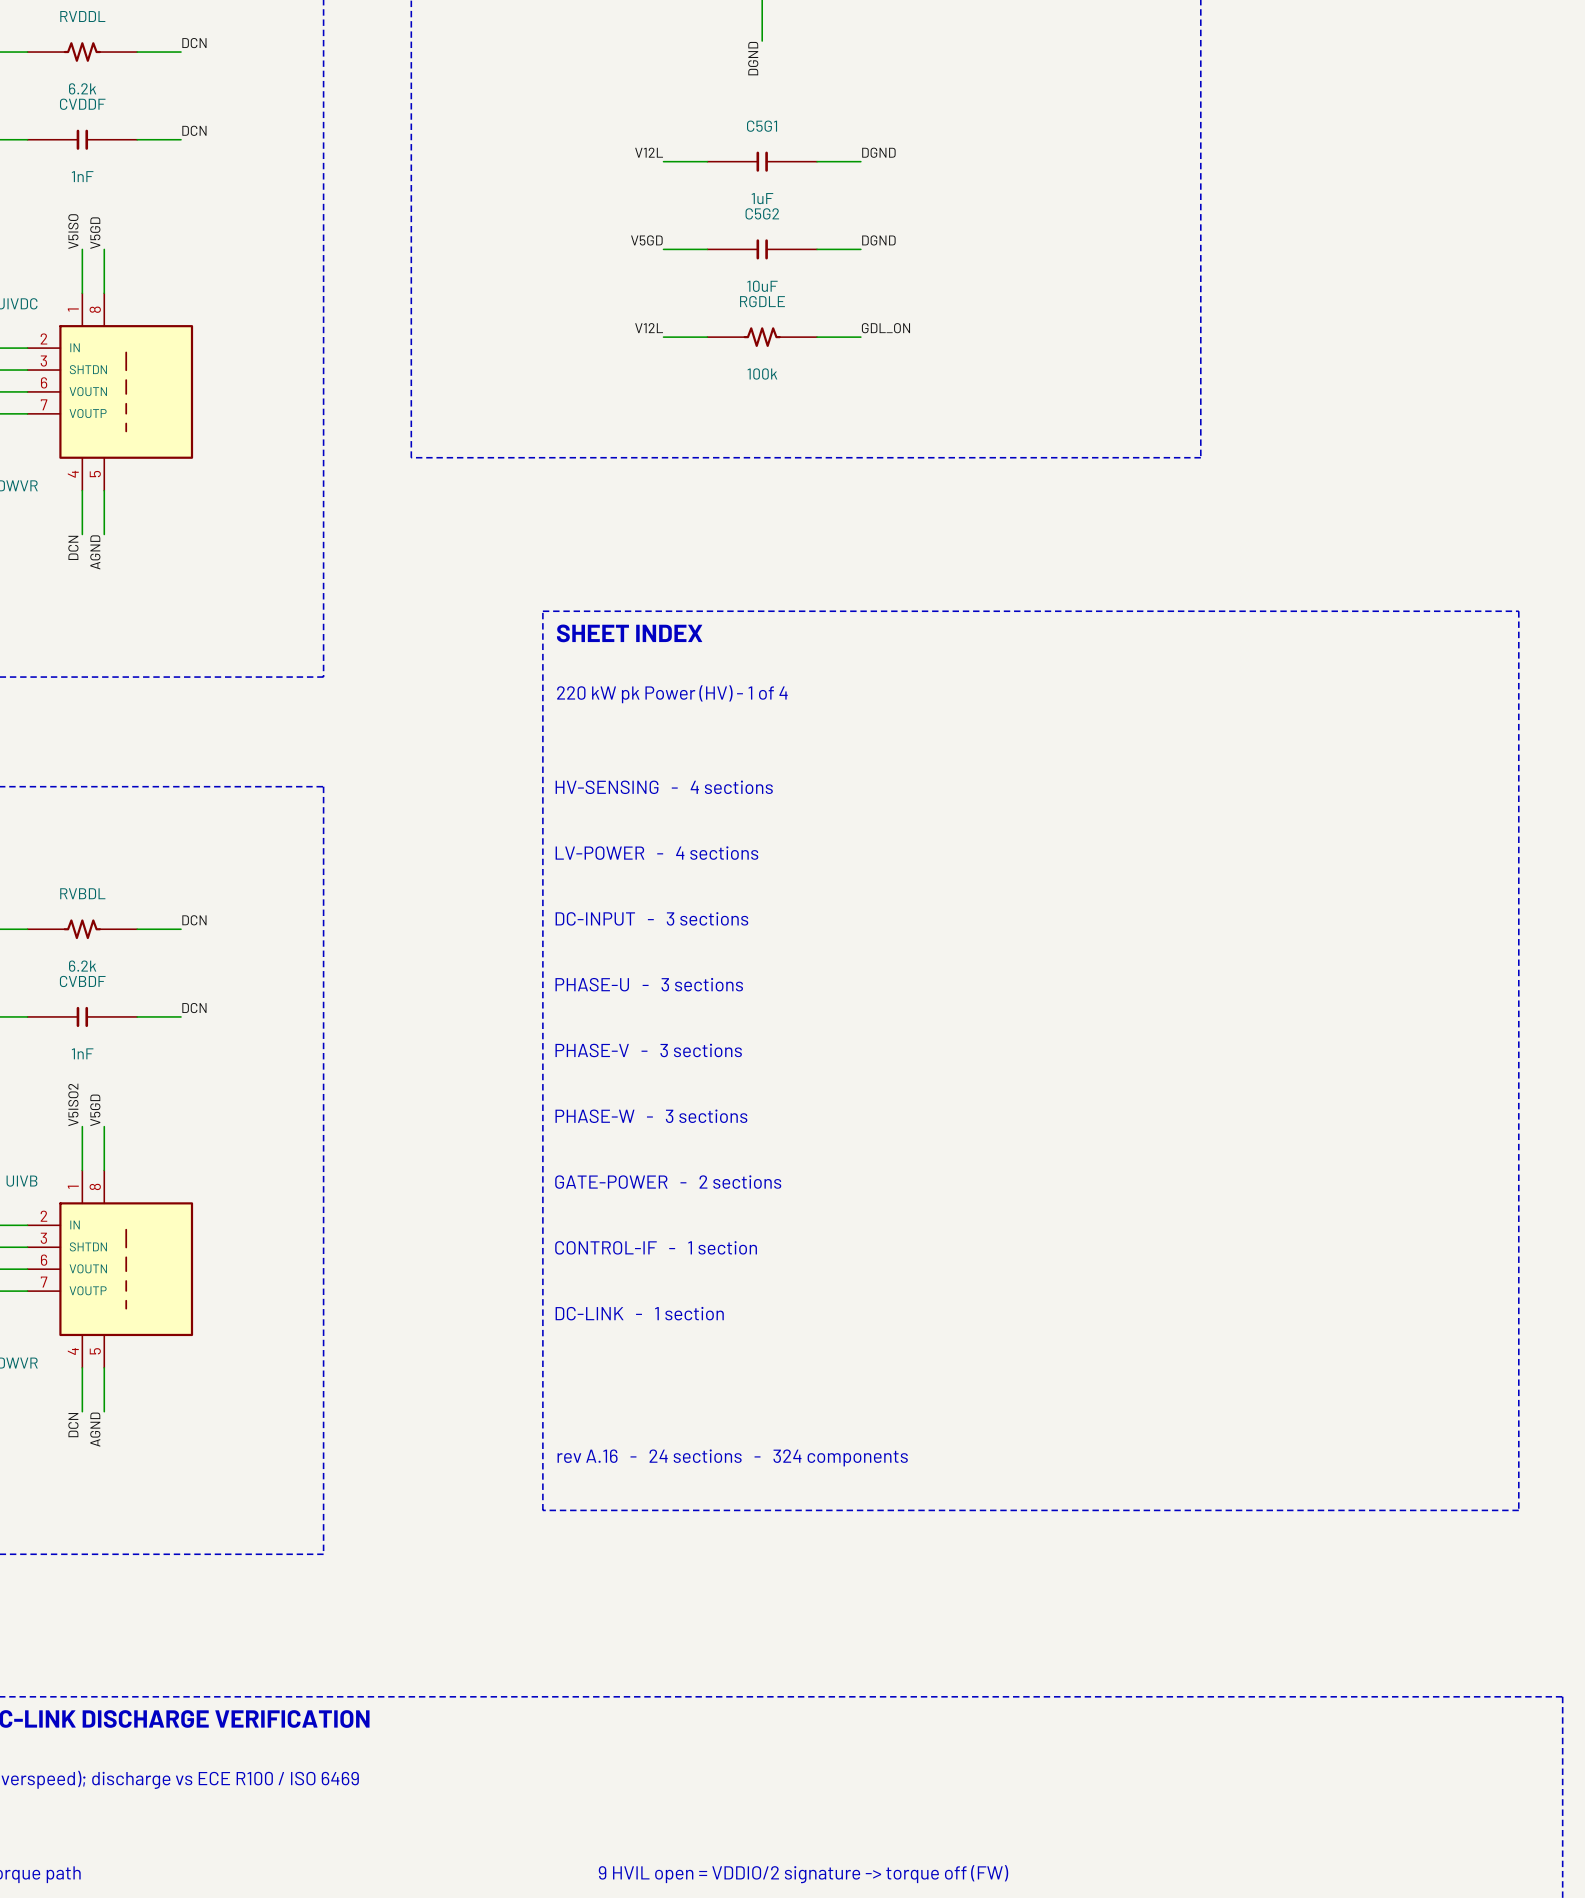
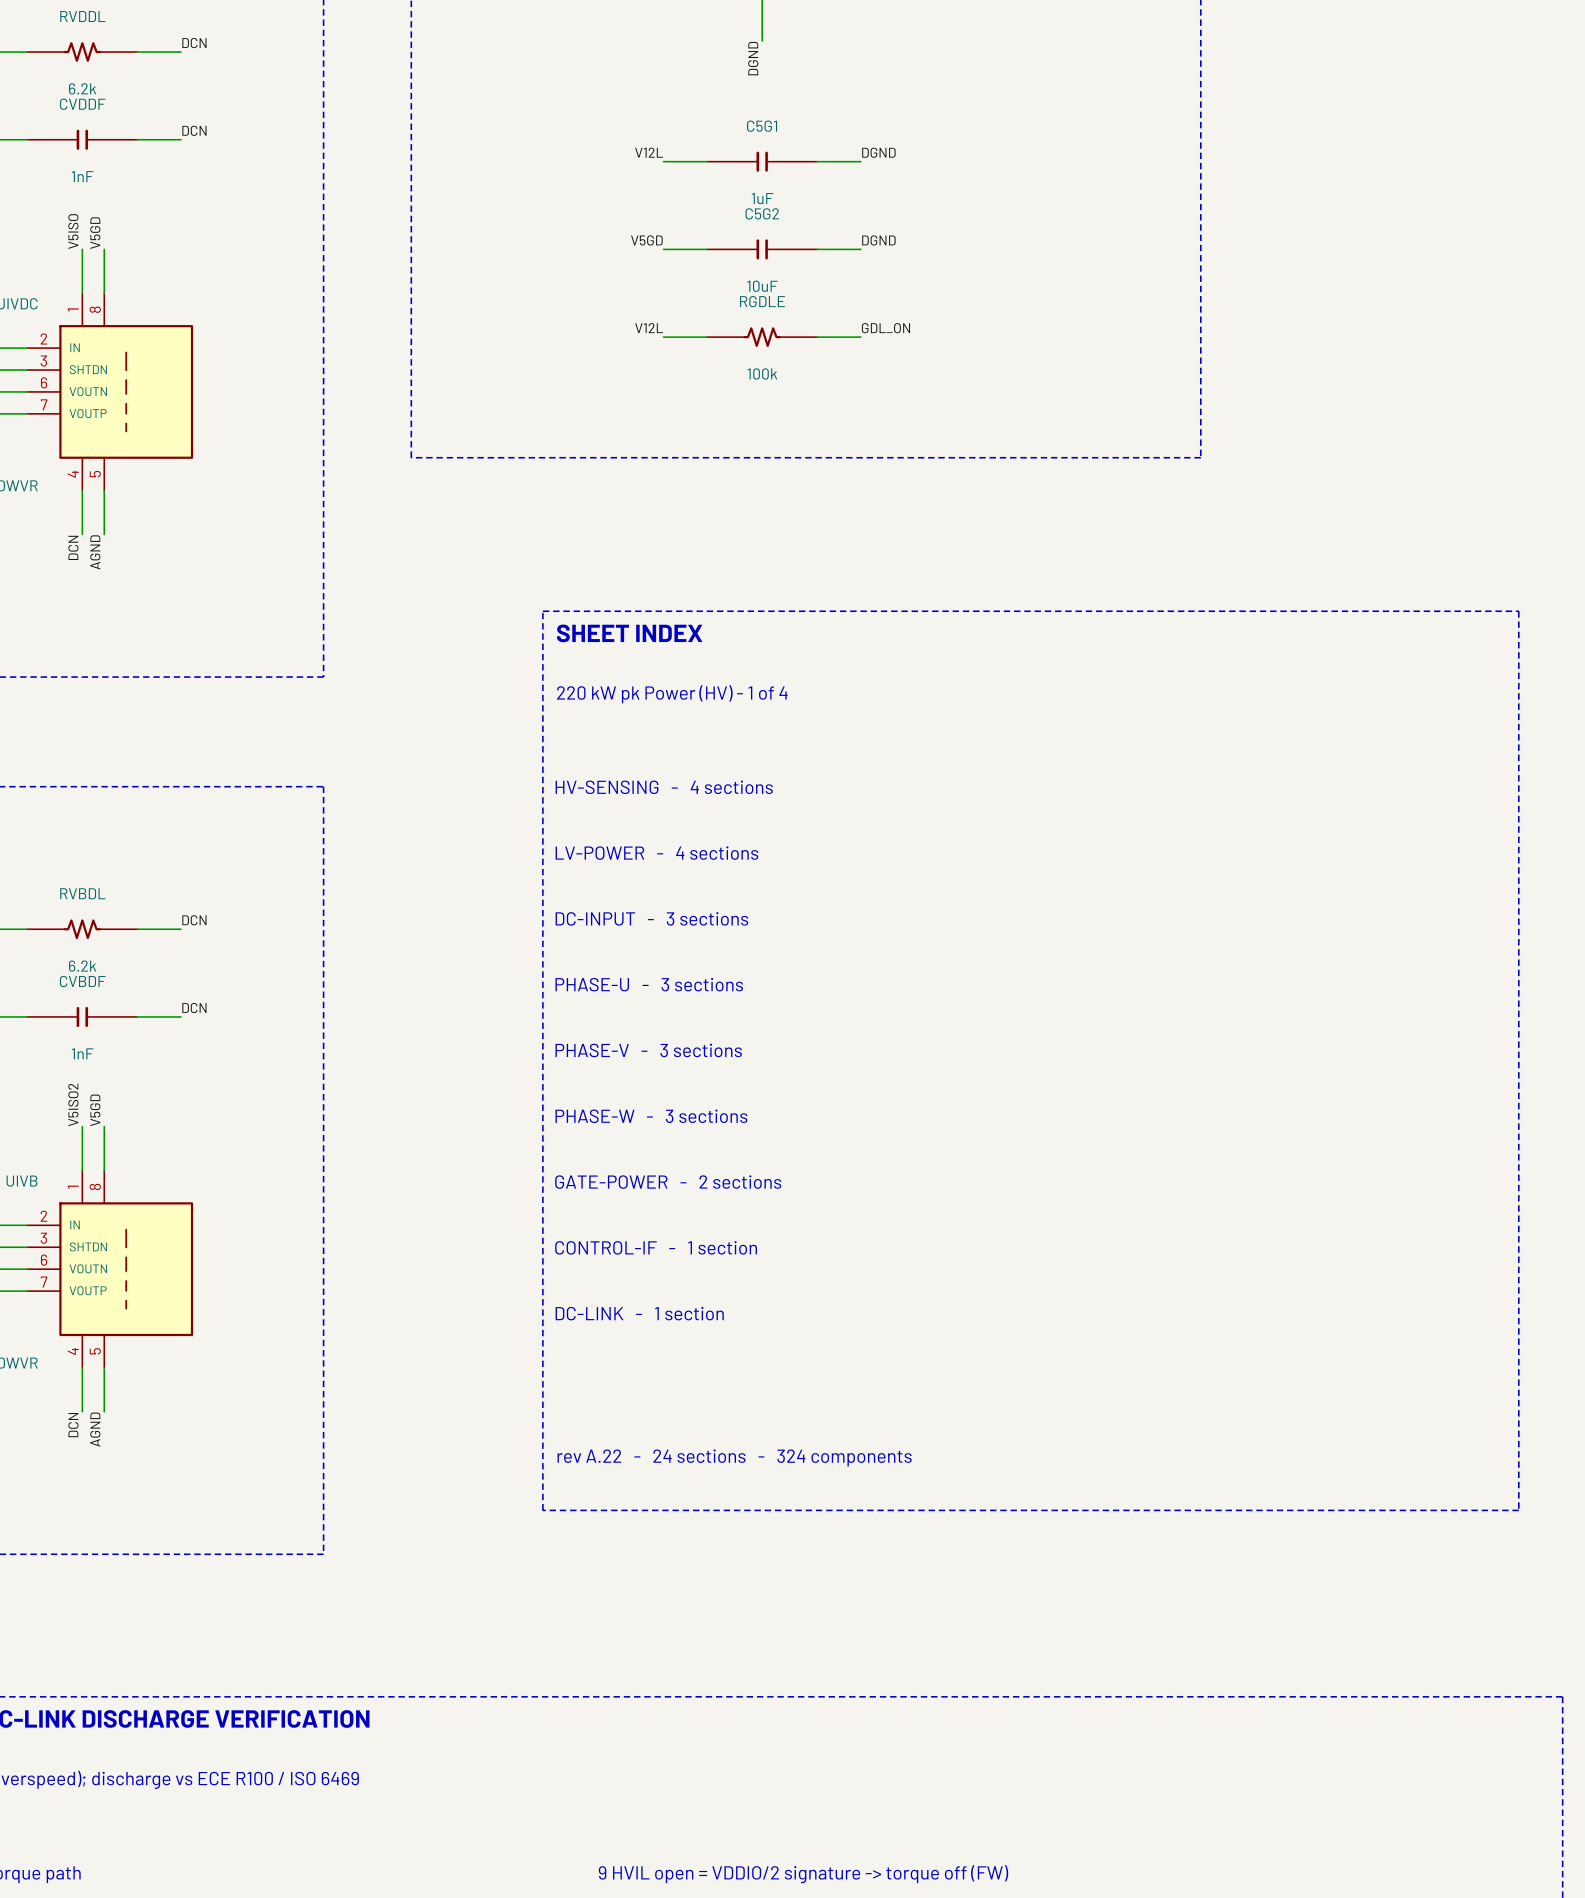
text: rev A.16 - 24 sections - 324 components (732, 1457) -> rev A.22 - 24 sections - 324 components (734, 1457)

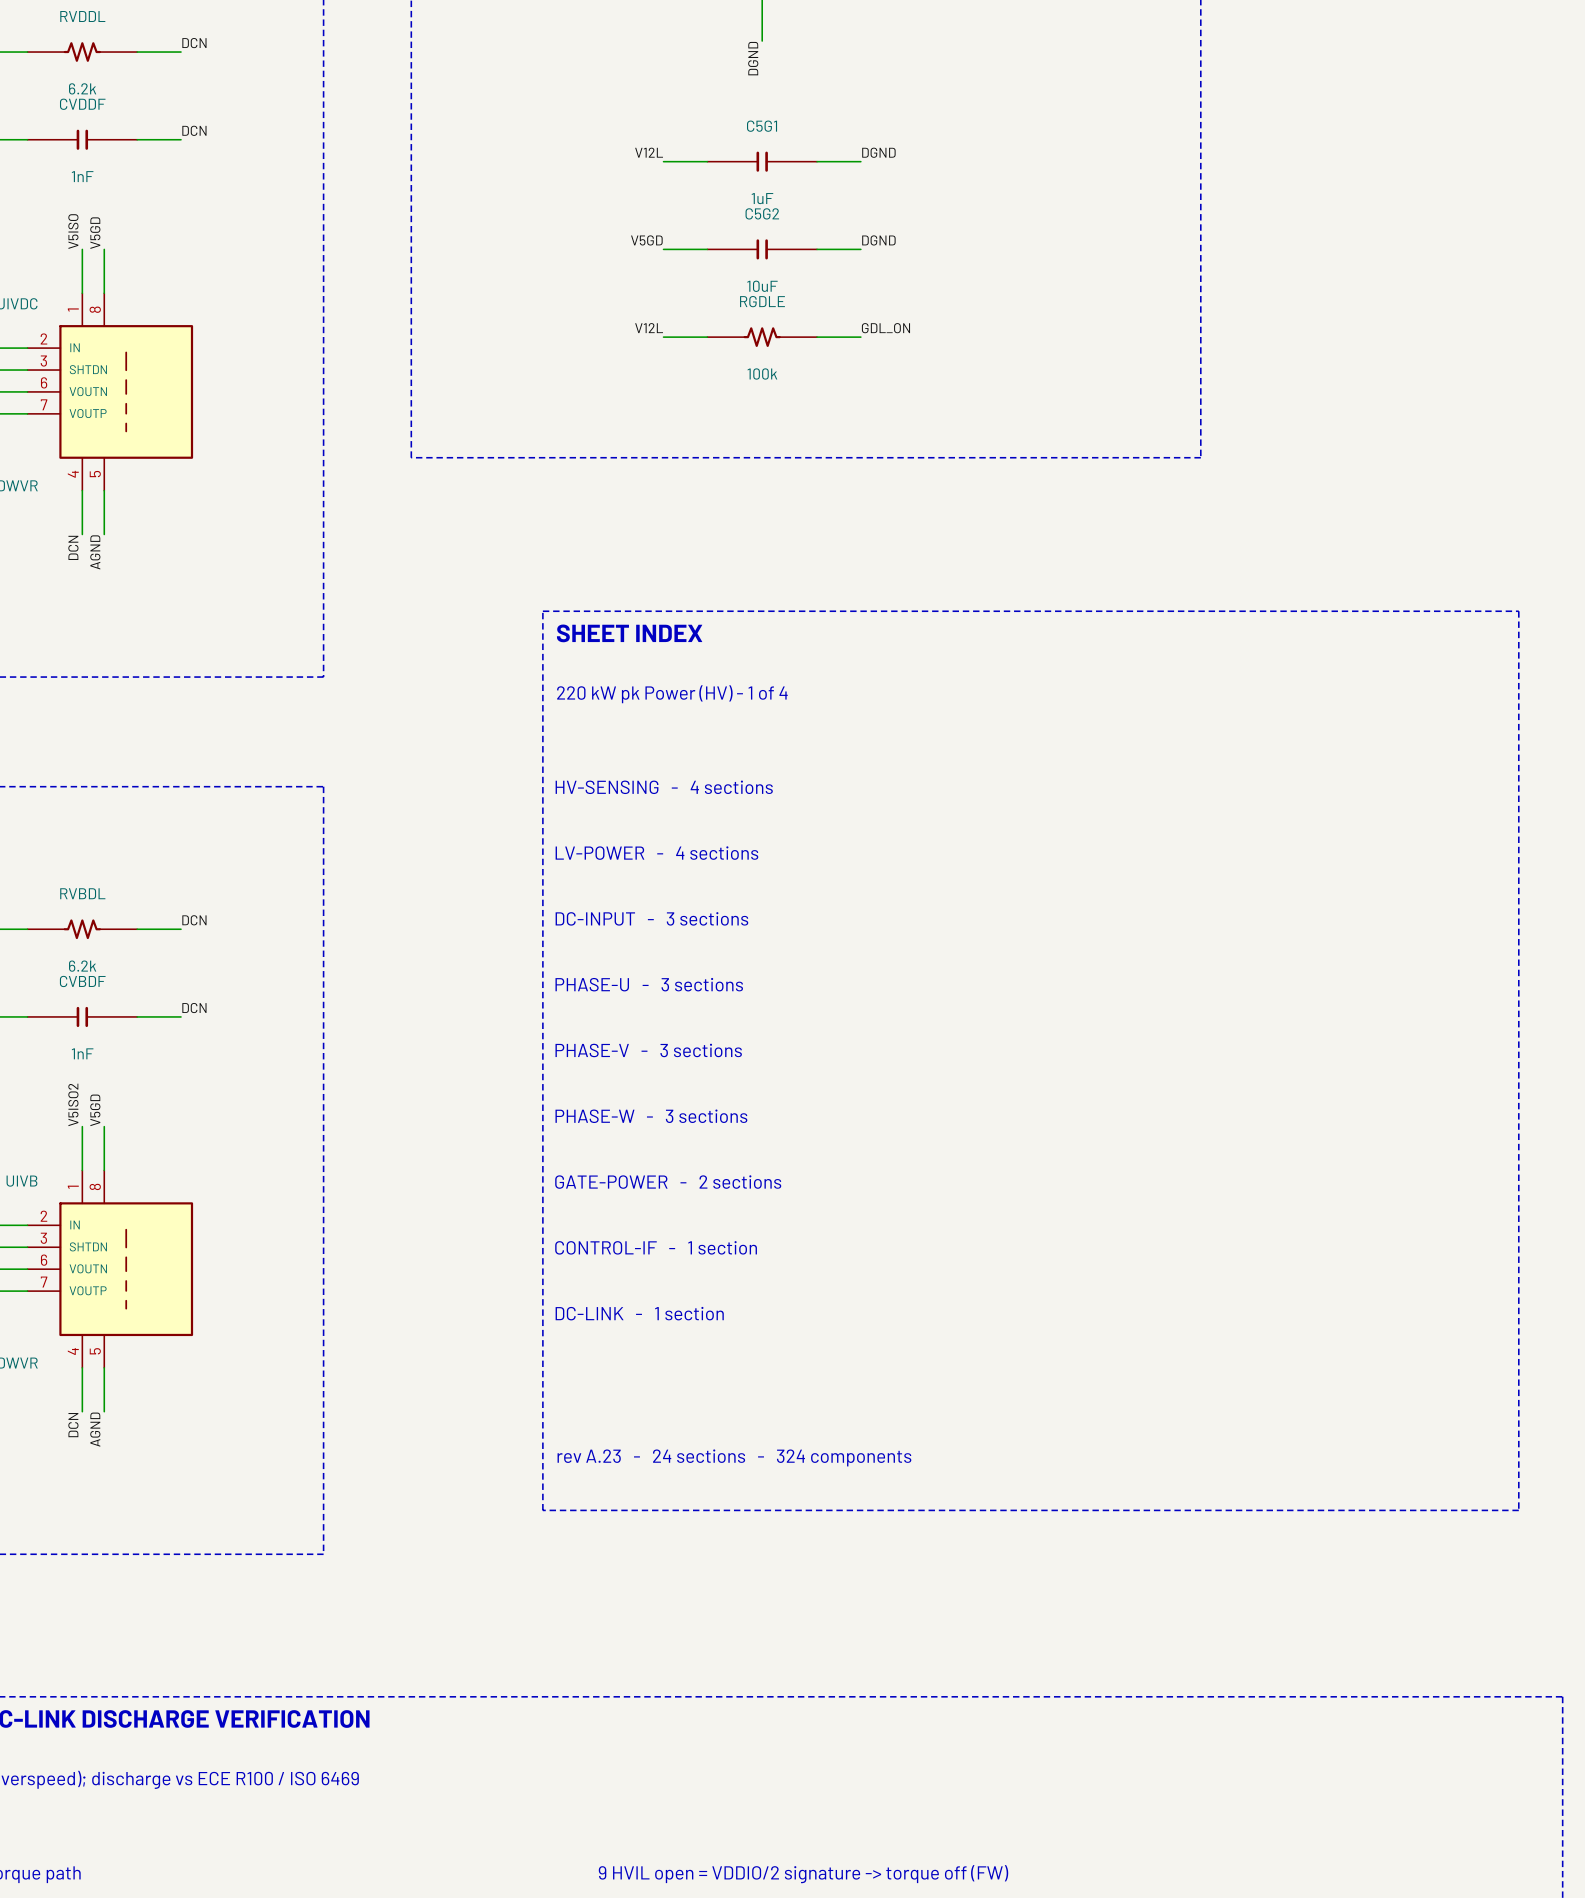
text: rev A.22 - 24 sections - 324 components (734, 1457) -> rev A.23 - 24 sections - 324 components (734, 1457)

